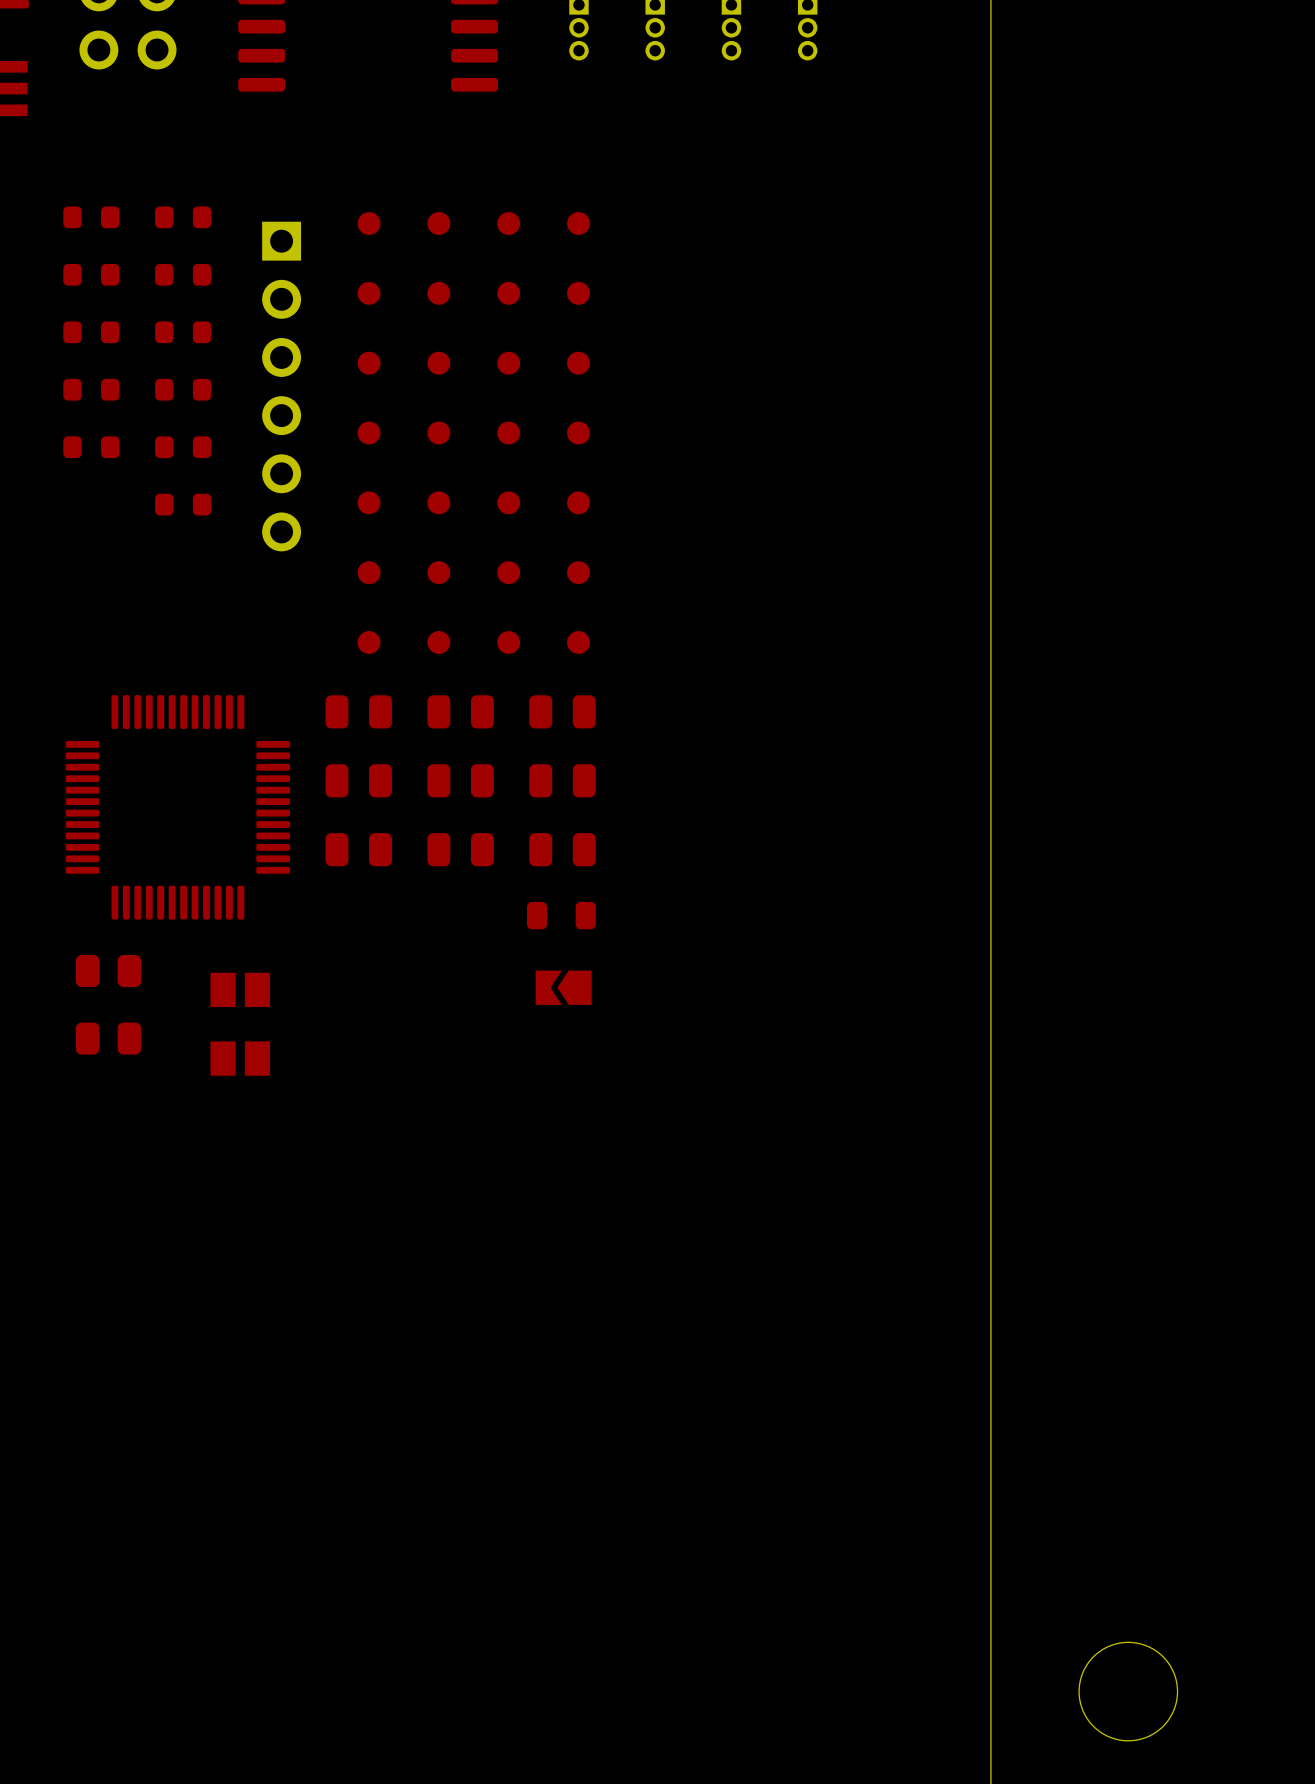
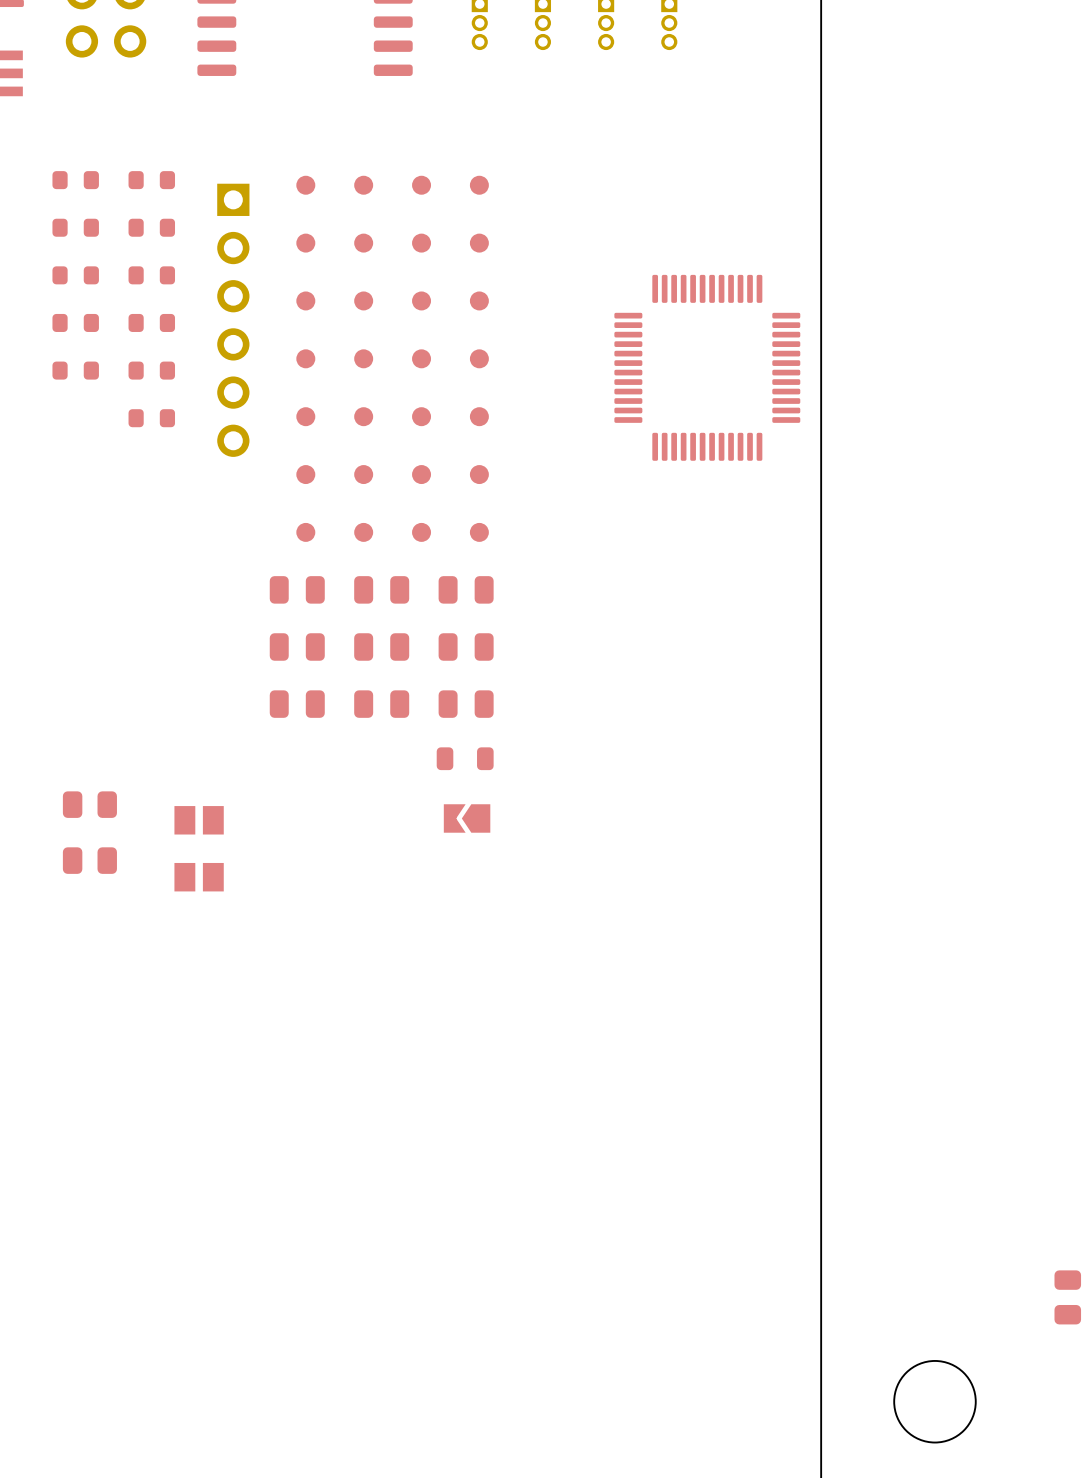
part: none -> (707, 367)
part: (177, 807) -> none
part: none -> (1067, 1297)

